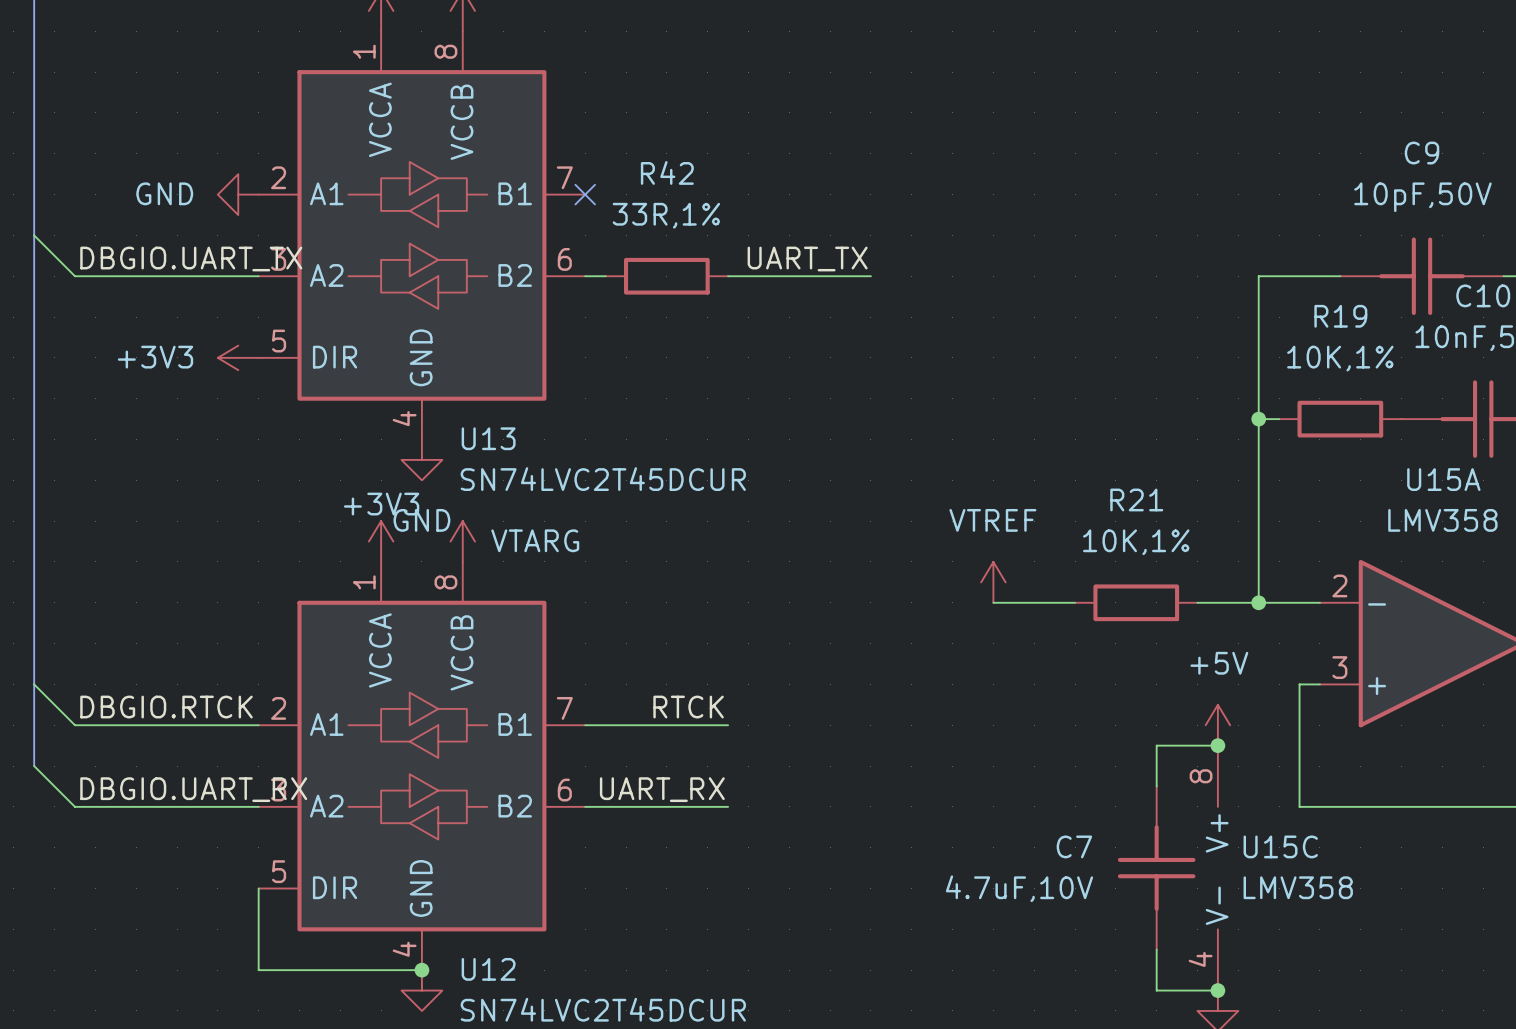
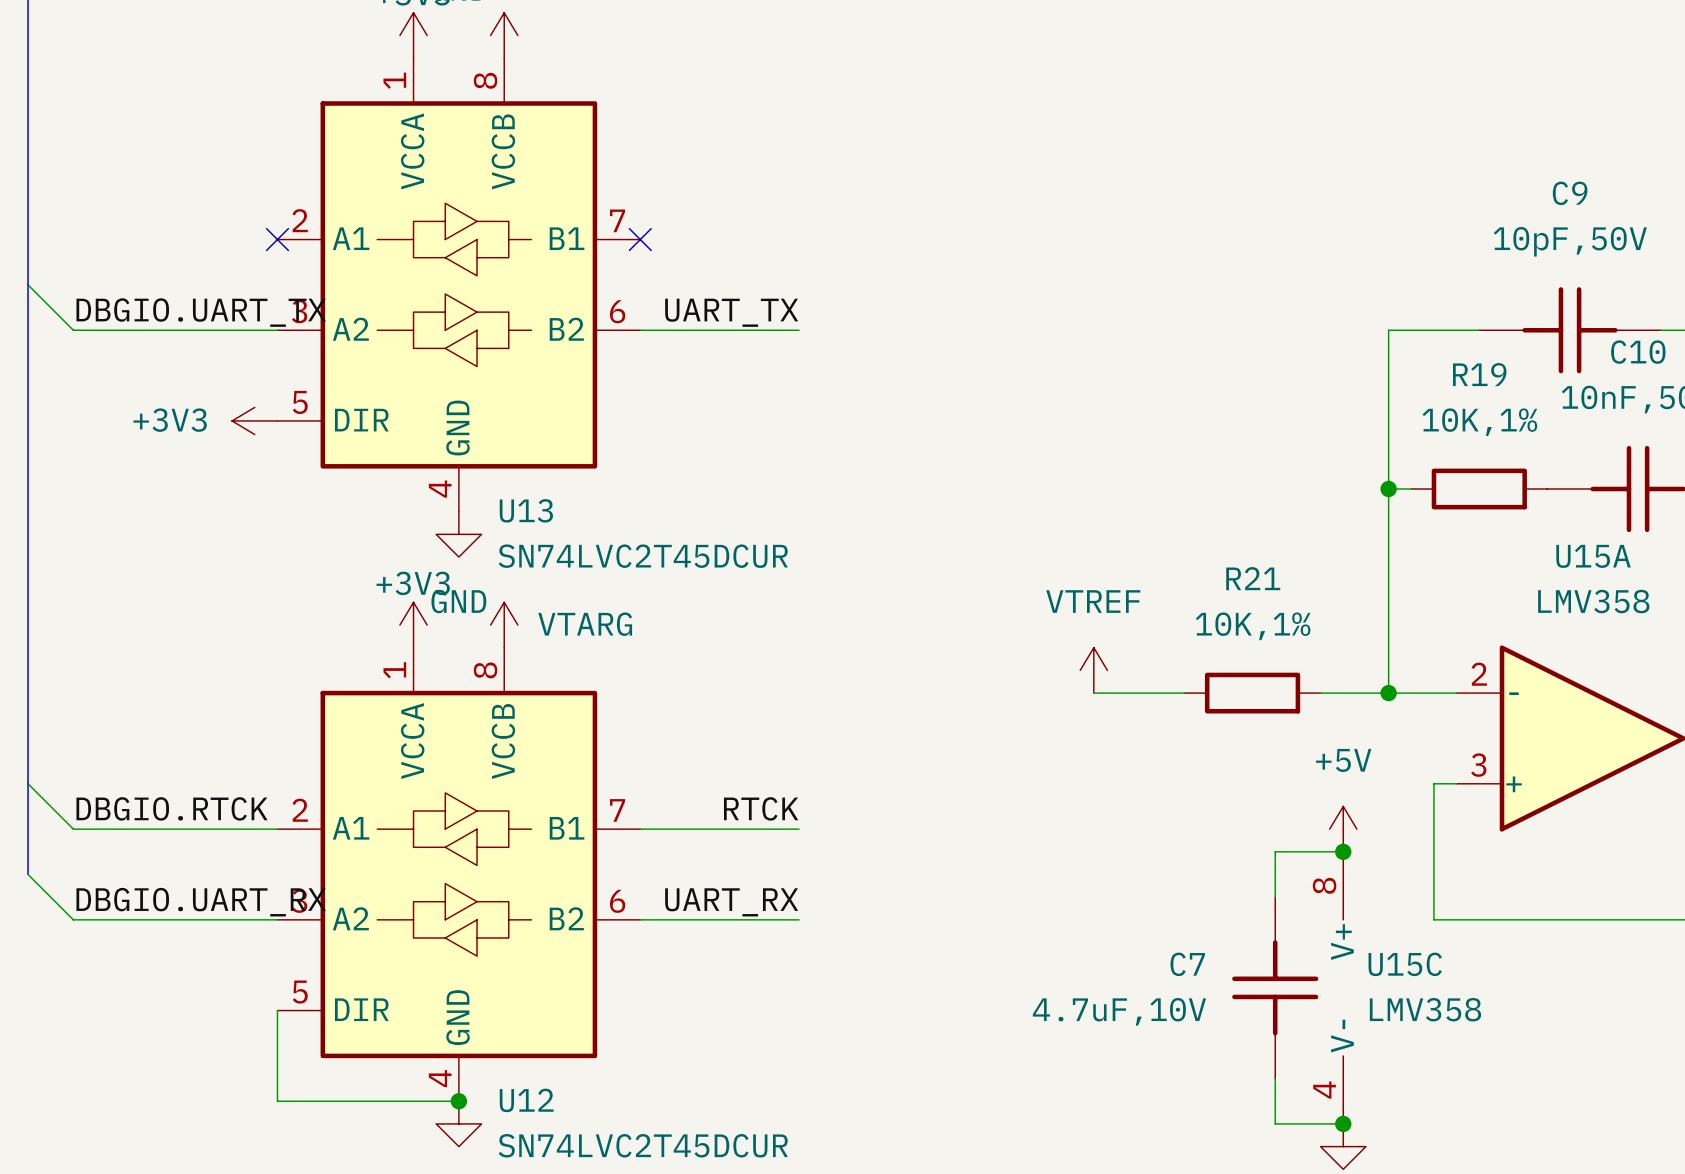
power symbol: GND (238, 194) -> none
no-connect mark: none -> (277, 239)
label position: UART_TX (807, 259) -> UART_TX (731, 312)
R42: 33R,1% (666, 276) -> none
wire: (728, 276) (870, 276) -> (799, 330) (662, 330)

